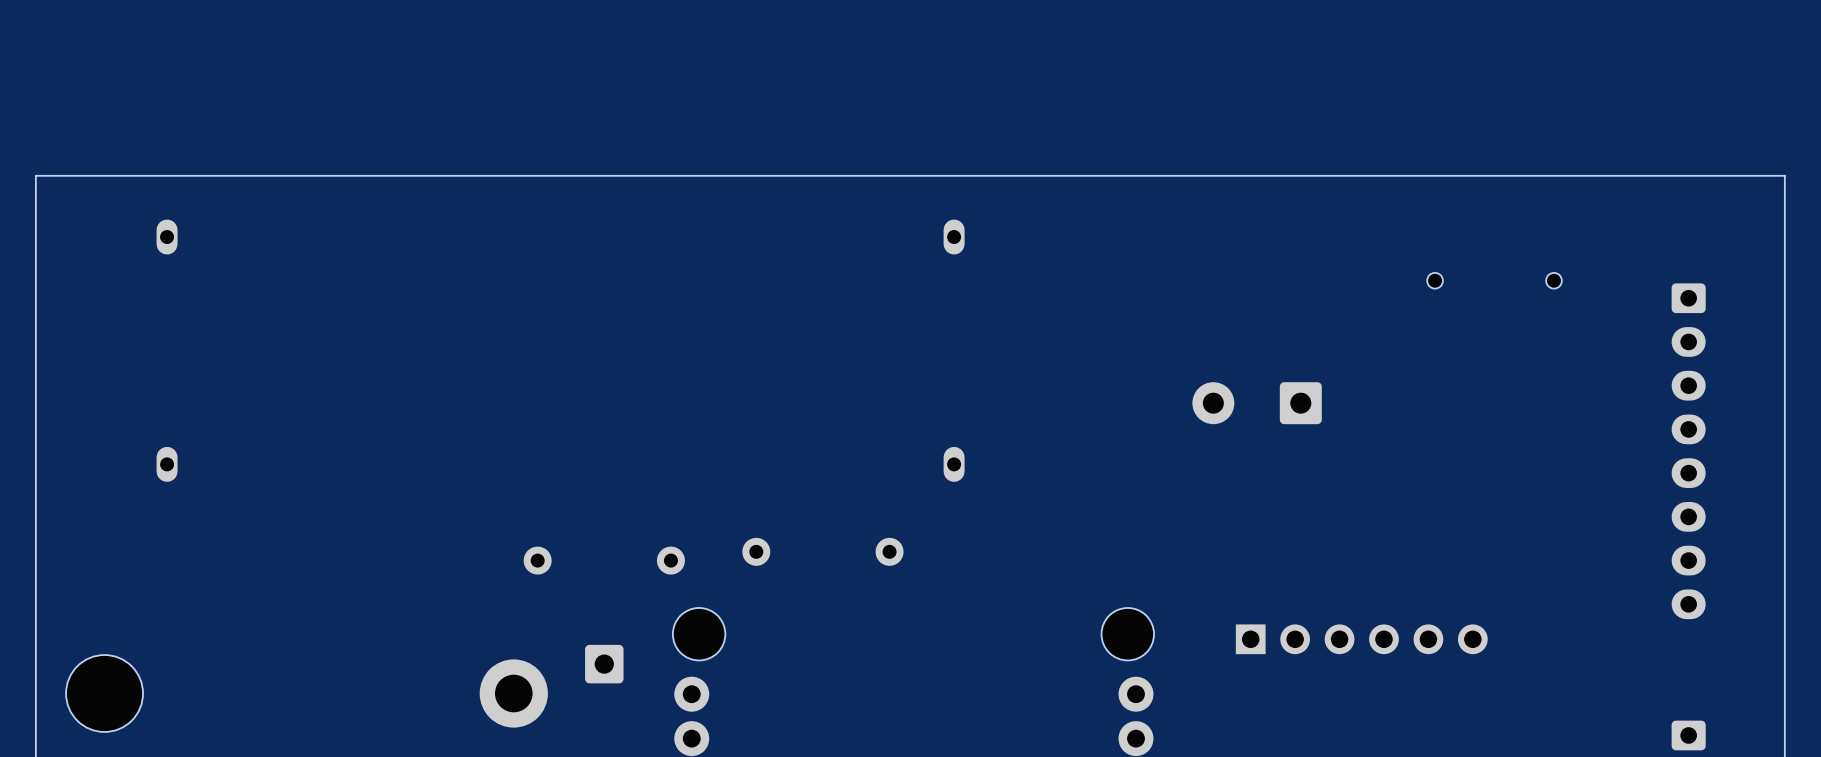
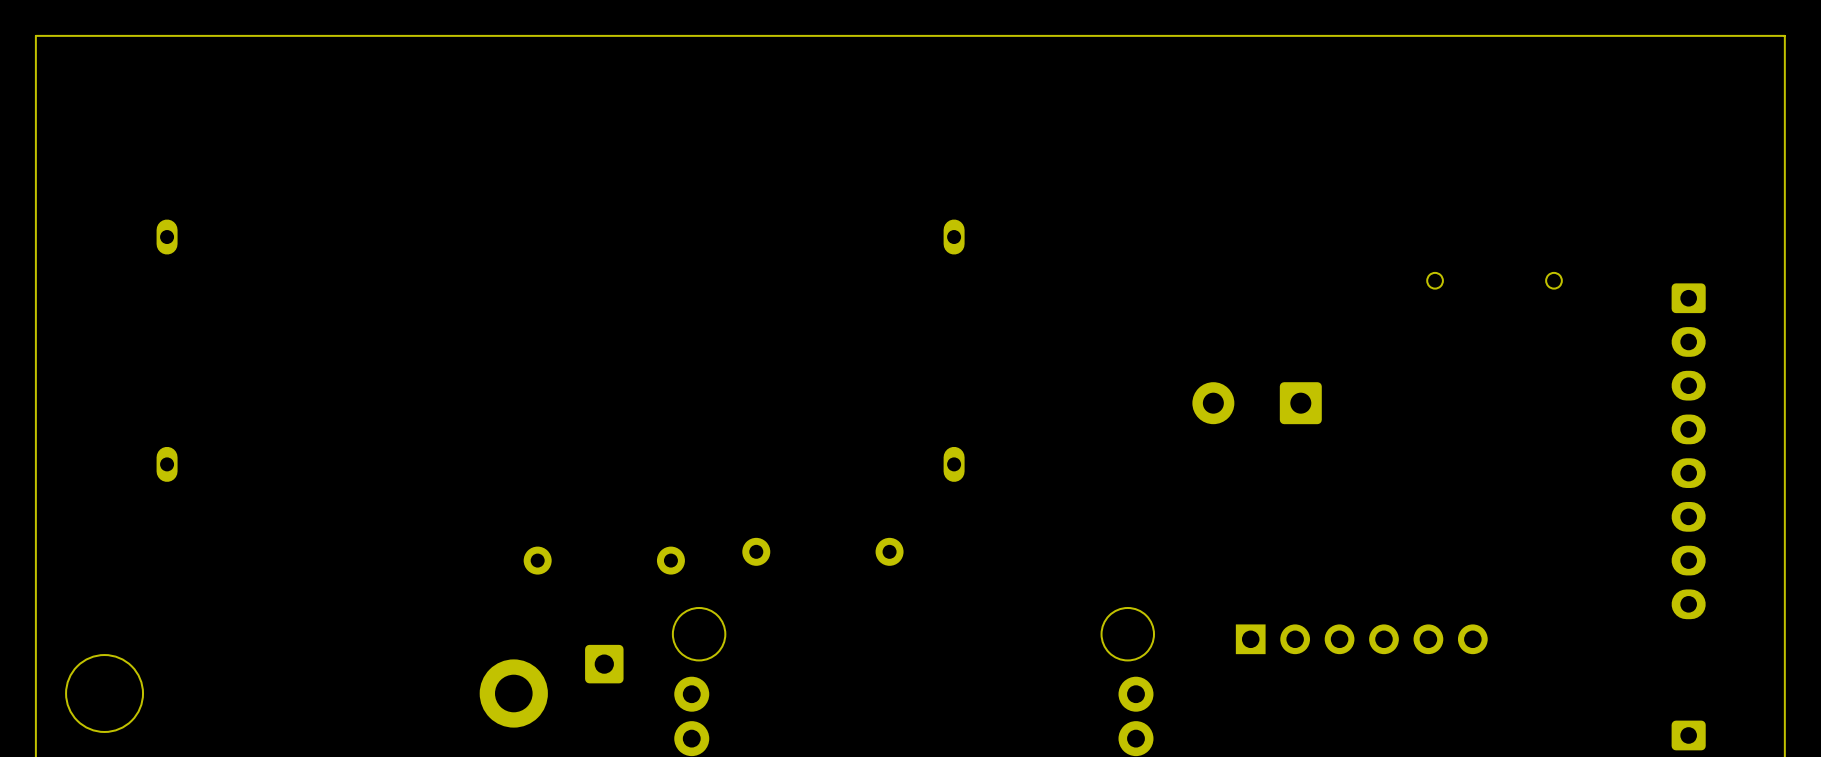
board edge: (1784, 175) (35, 175) -> (1784, 175) (1784, 35) (35, 35) (35, 175)

